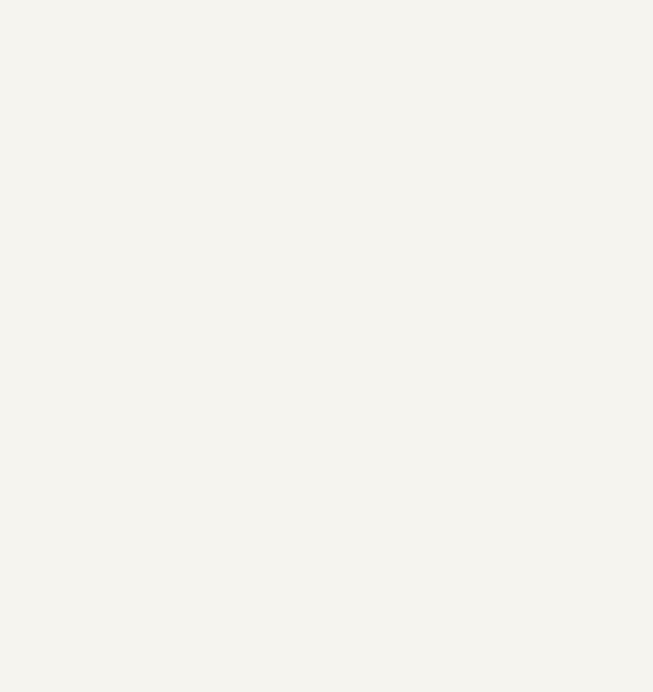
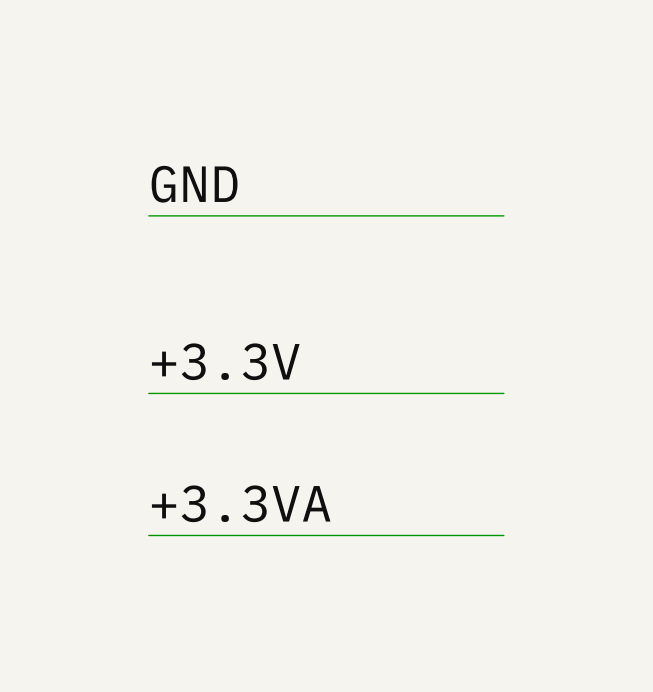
label: none -> GND (194, 184)
wire: none -> (148, 215) (503, 215)
label: none -> +3.3V (225, 361)
wire: none -> (148, 393) (503, 393)
label: none -> +3.3VA (241, 503)
wire: none -> (148, 535) (503, 535)

